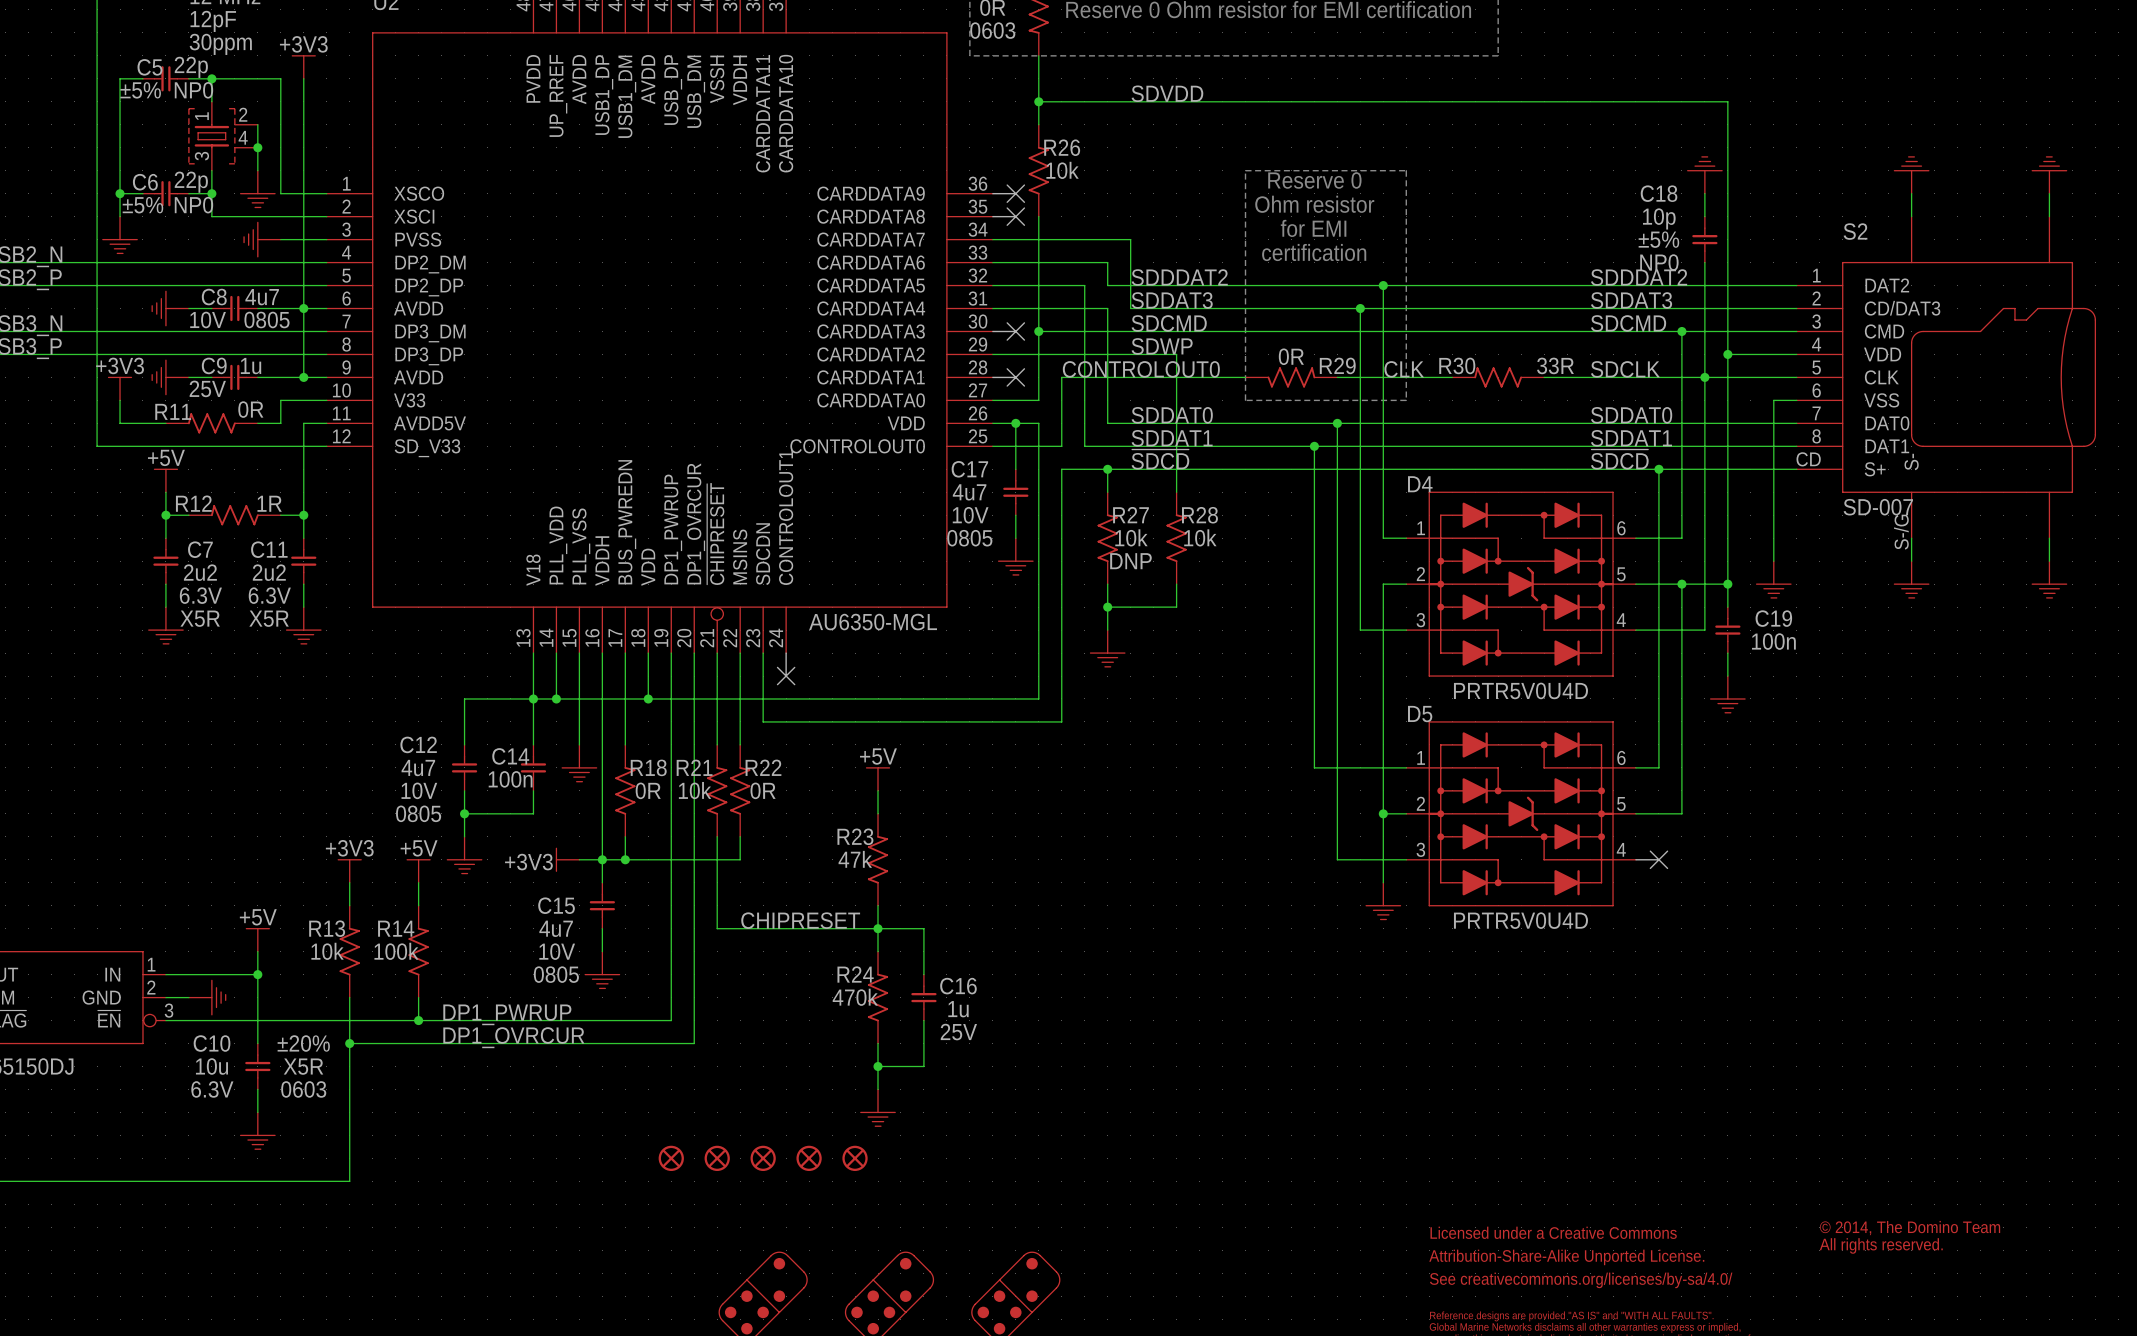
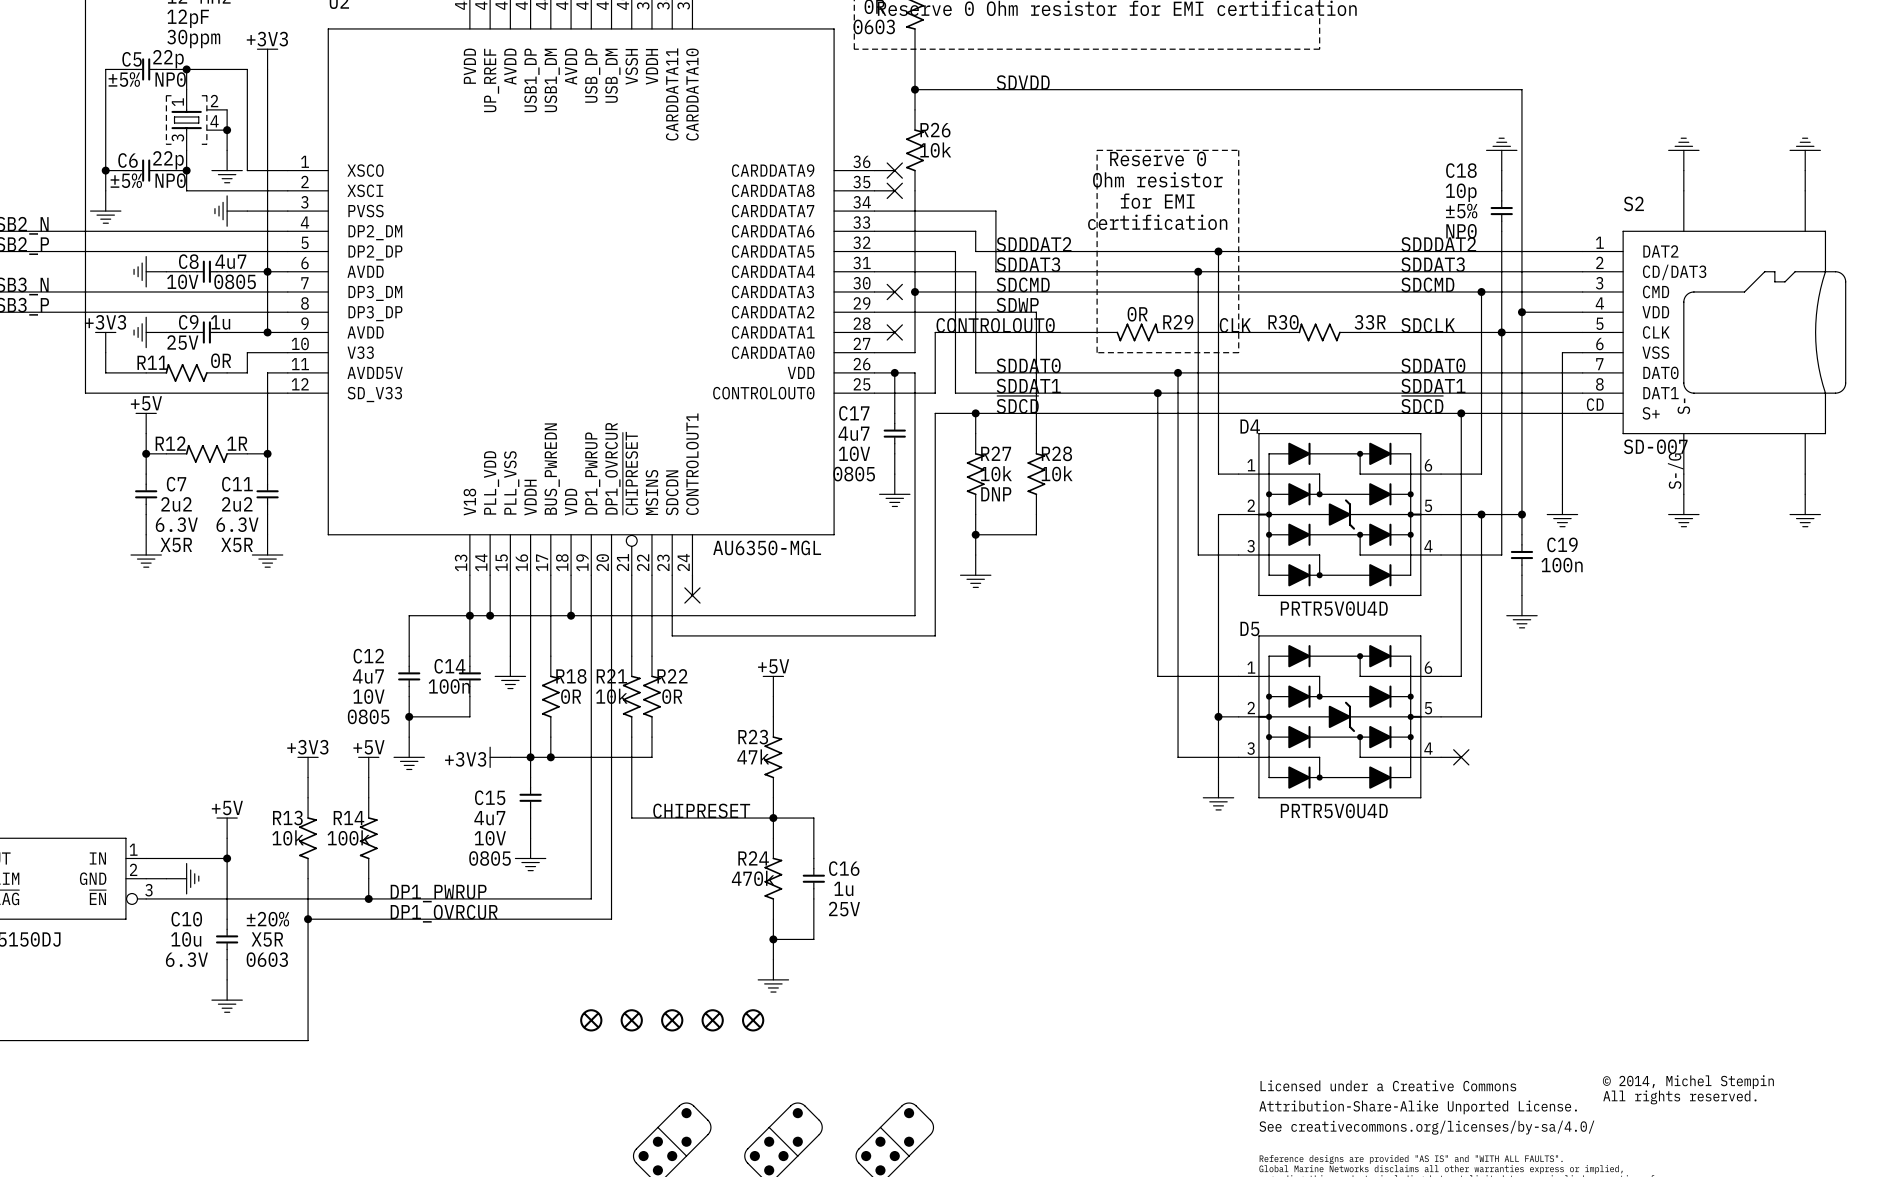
text: © 2014, The Domino Team (1910, 1228) -> © 2014, Michel Stempin (1688, 1082)

